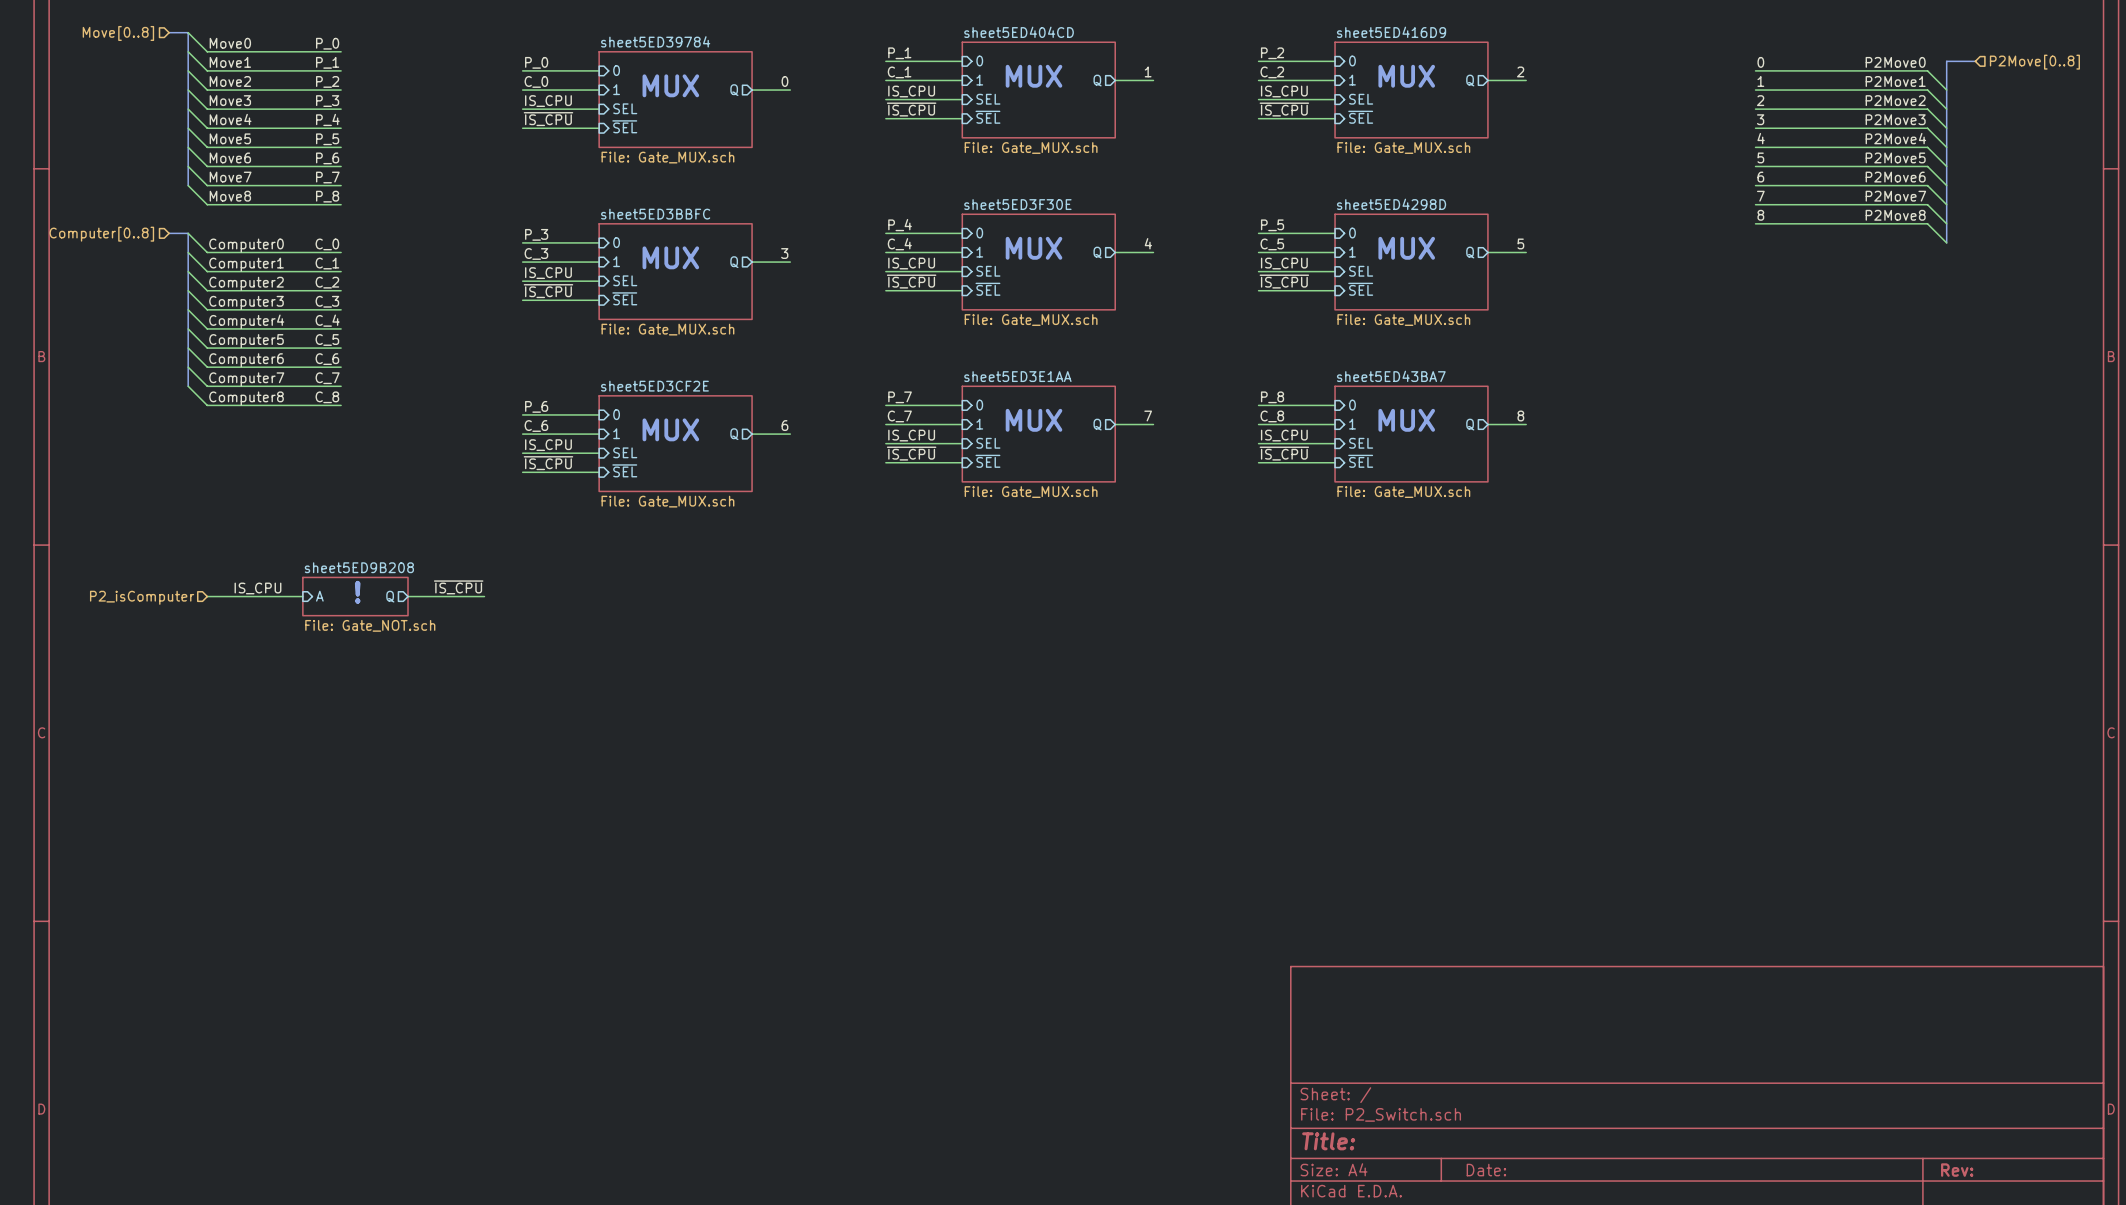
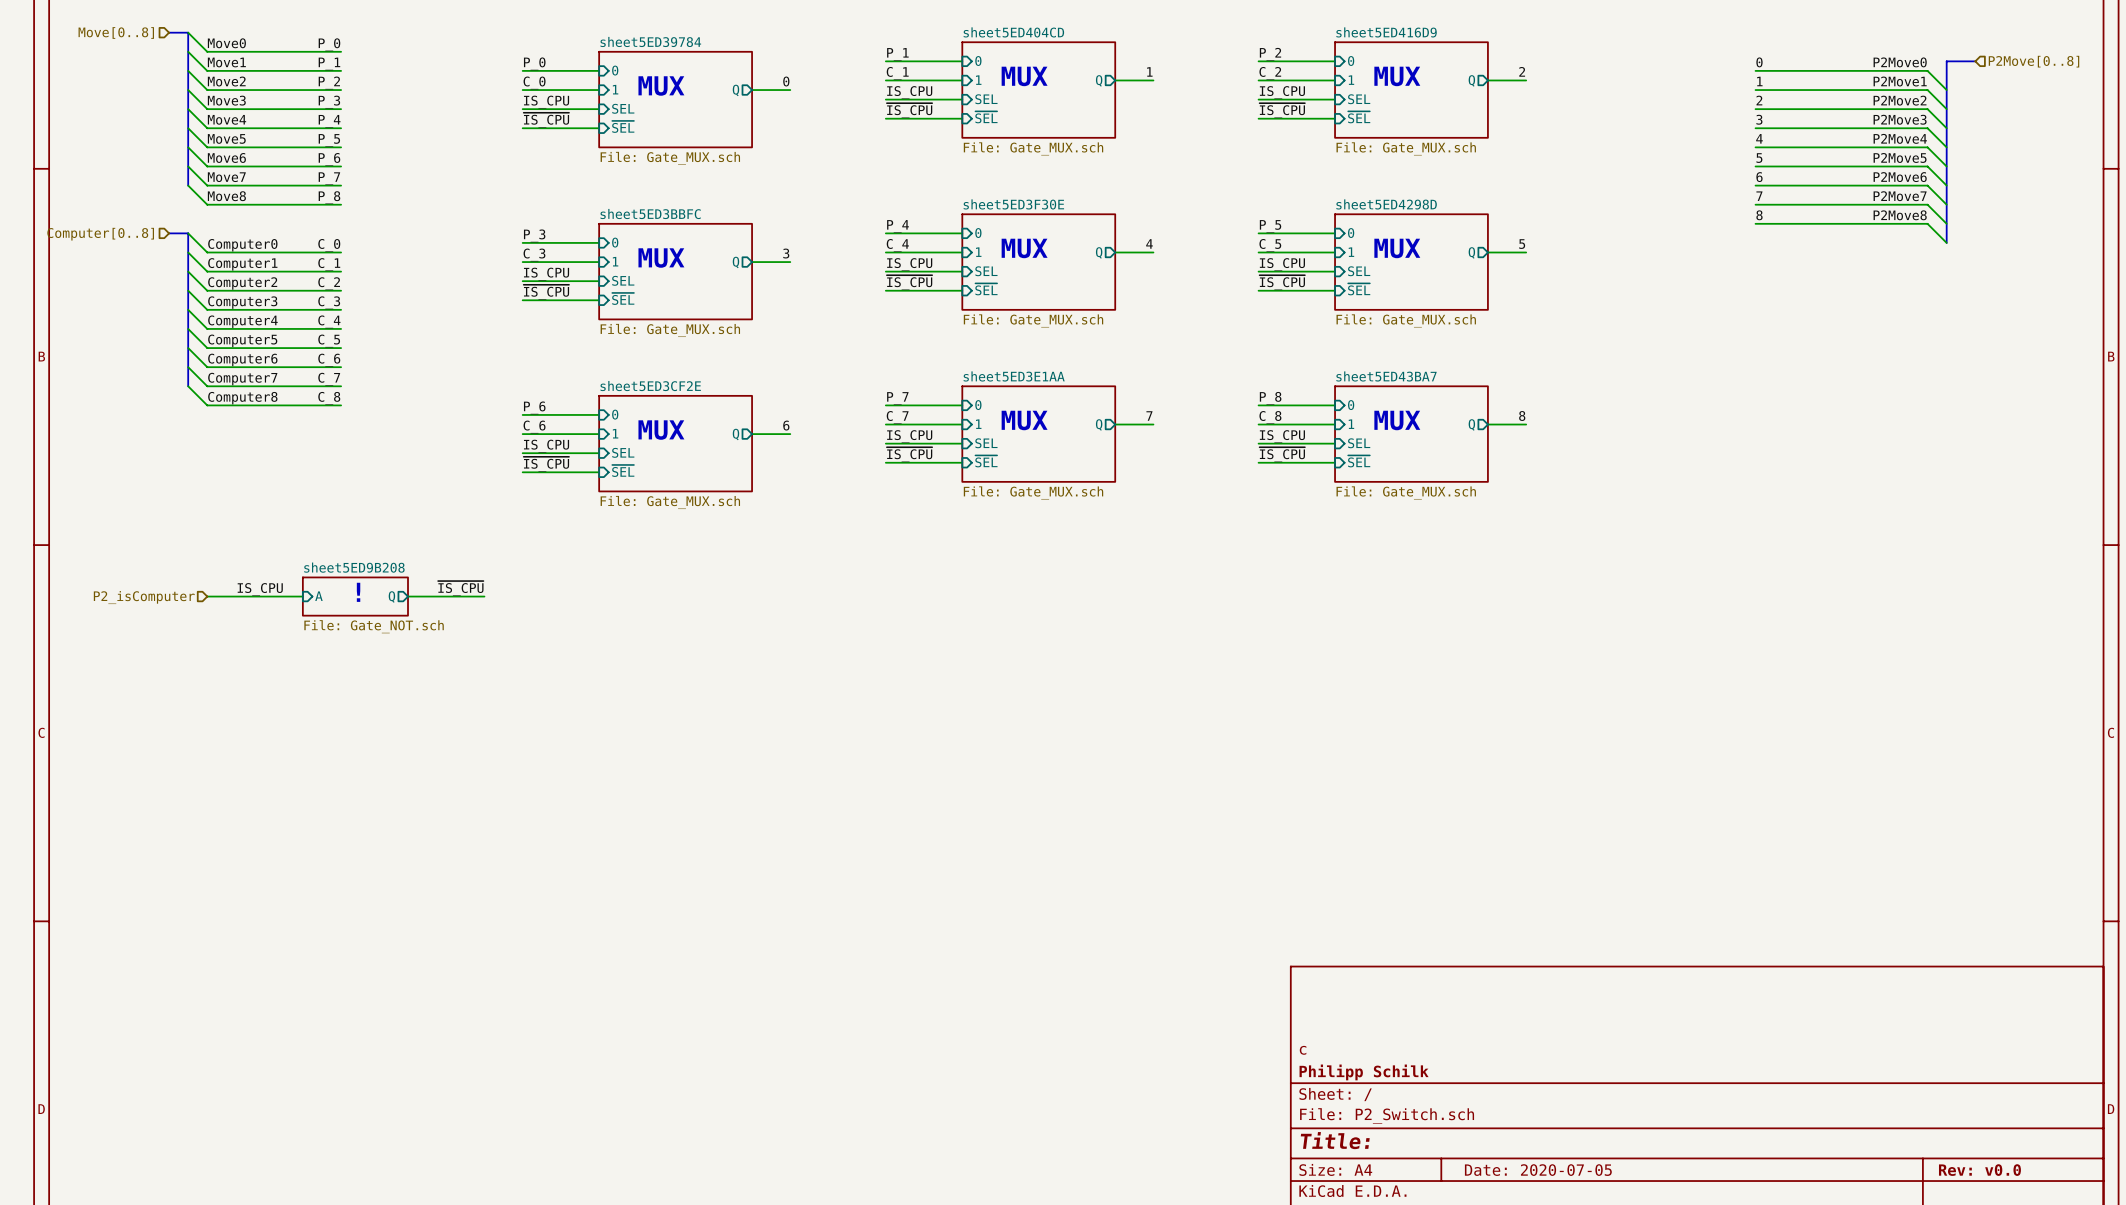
title block: none -> c (1303, 1050)
title block: none -> Philipp Schilk (1364, 1072)
title block: Date: (1486, 1170) -> Date: 2020-07-05 (1538, 1170)
title block: Rev: (1957, 1170) -> Rev: v0.0 (1979, 1170)

